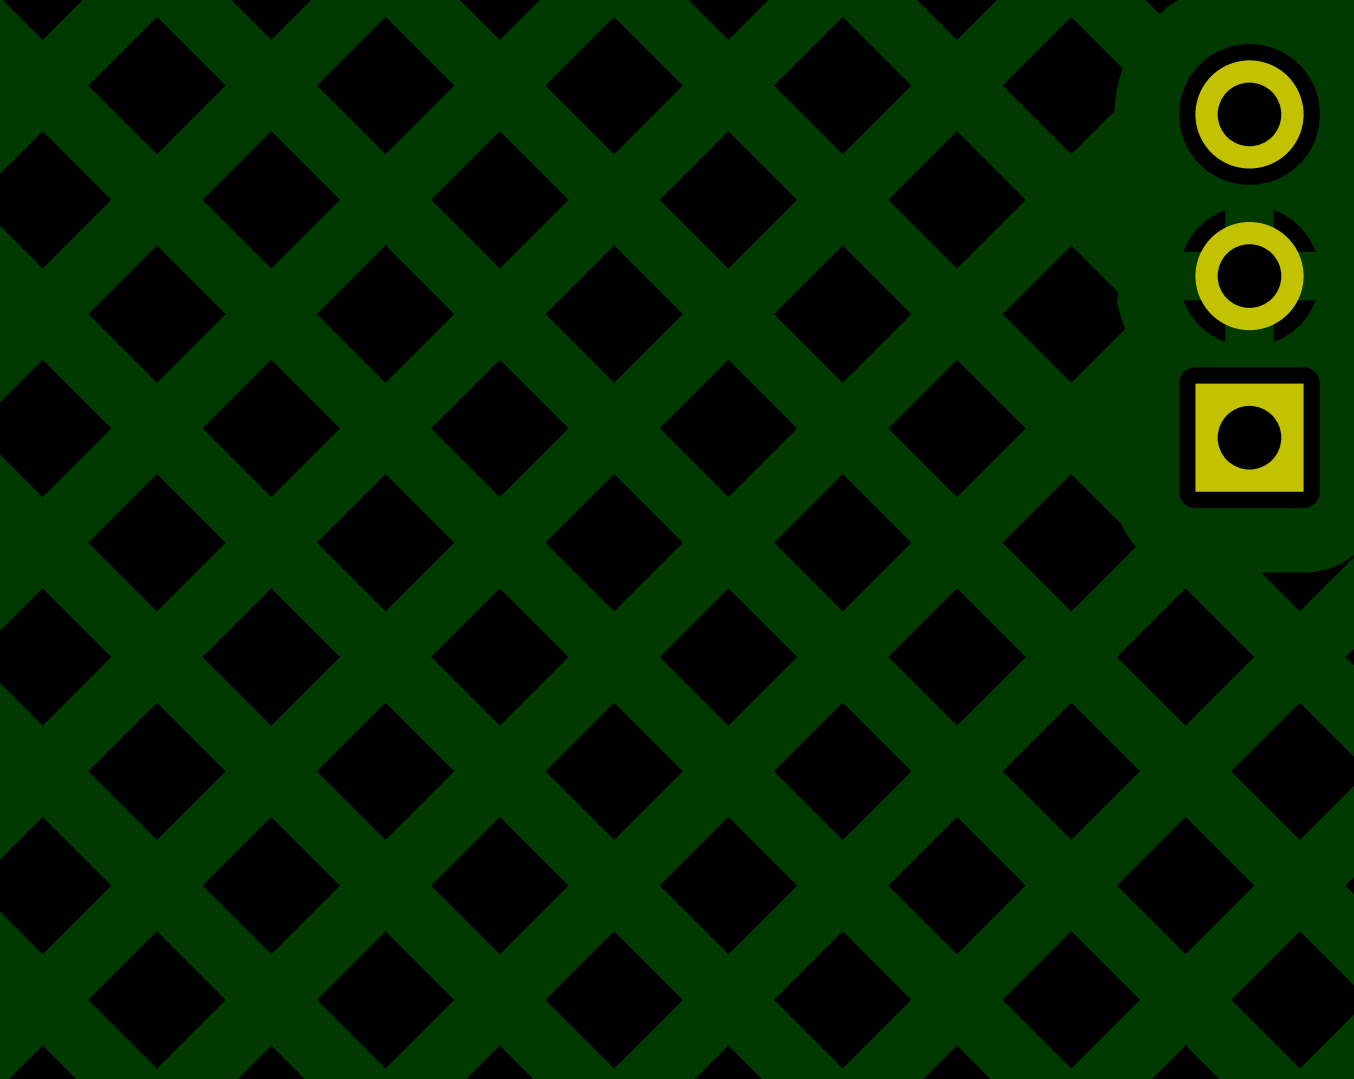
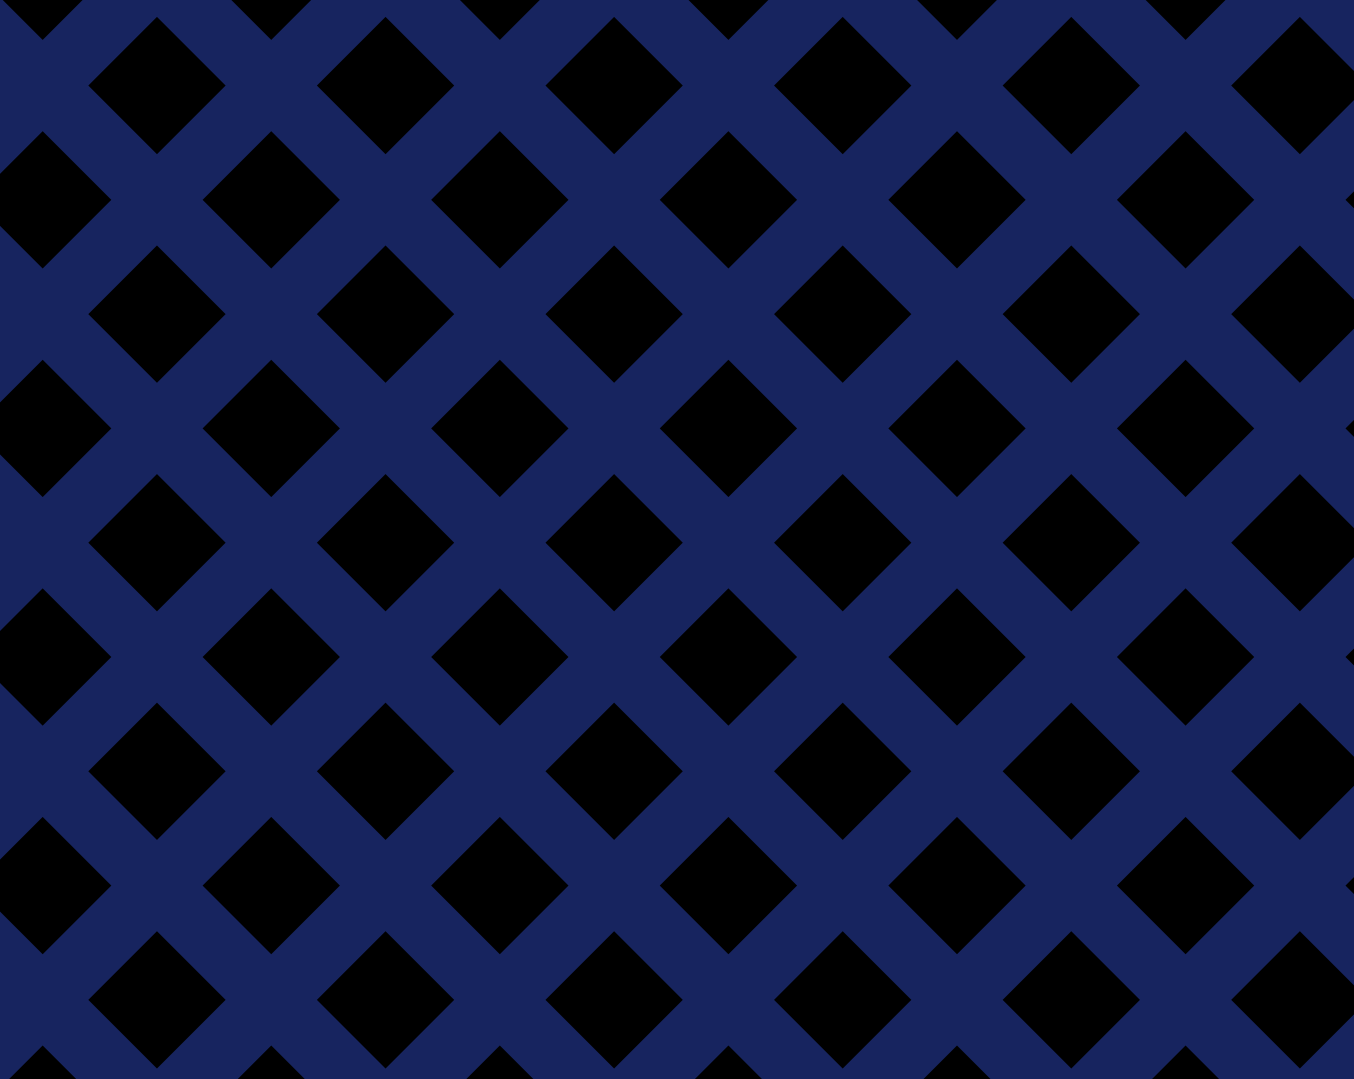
part: (1249, 276) -> none

